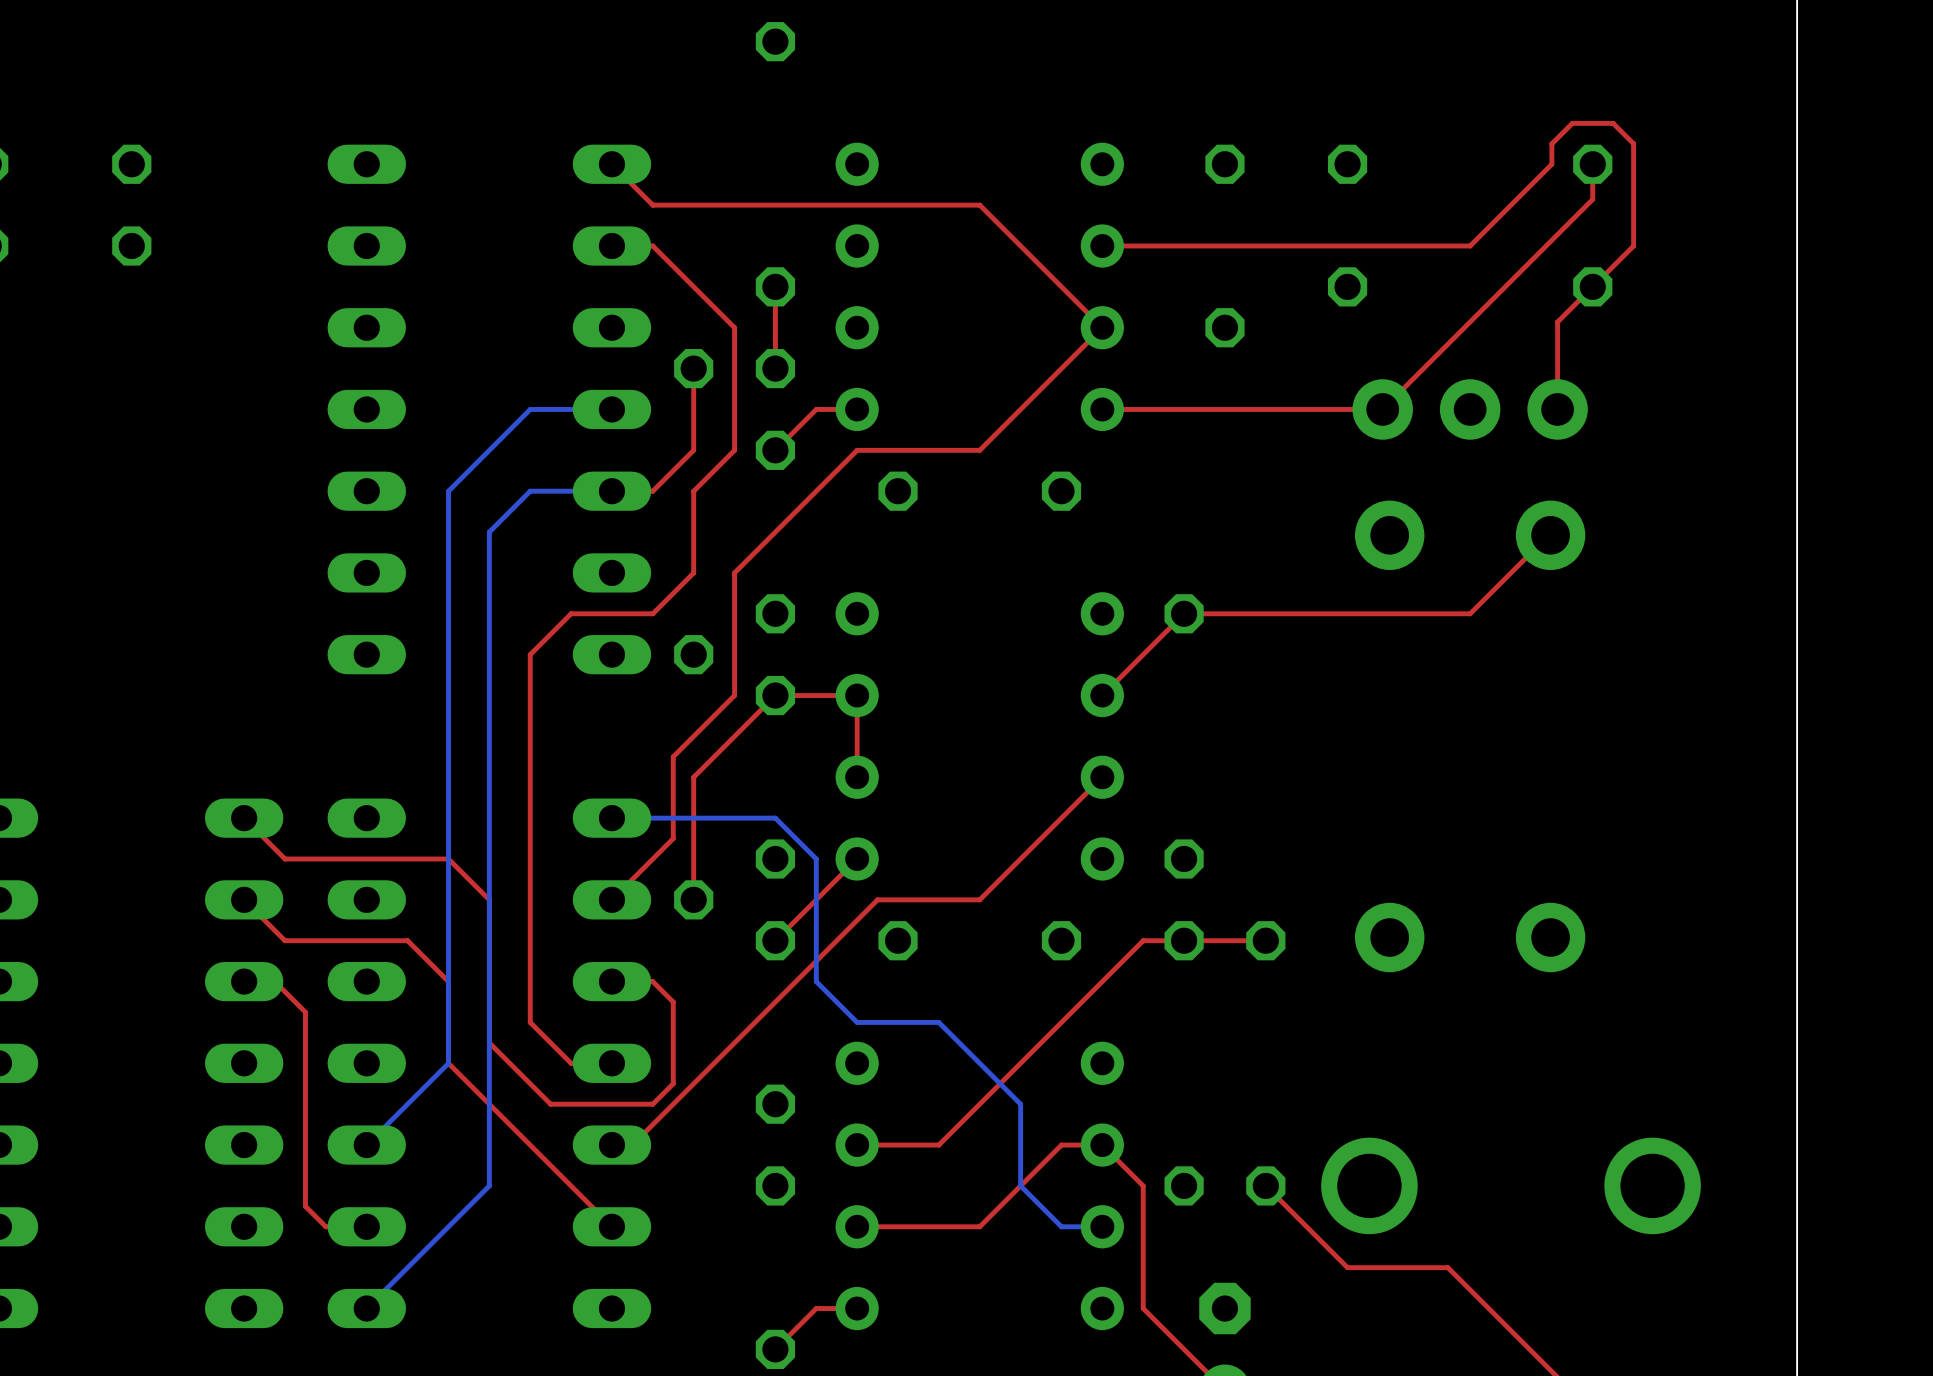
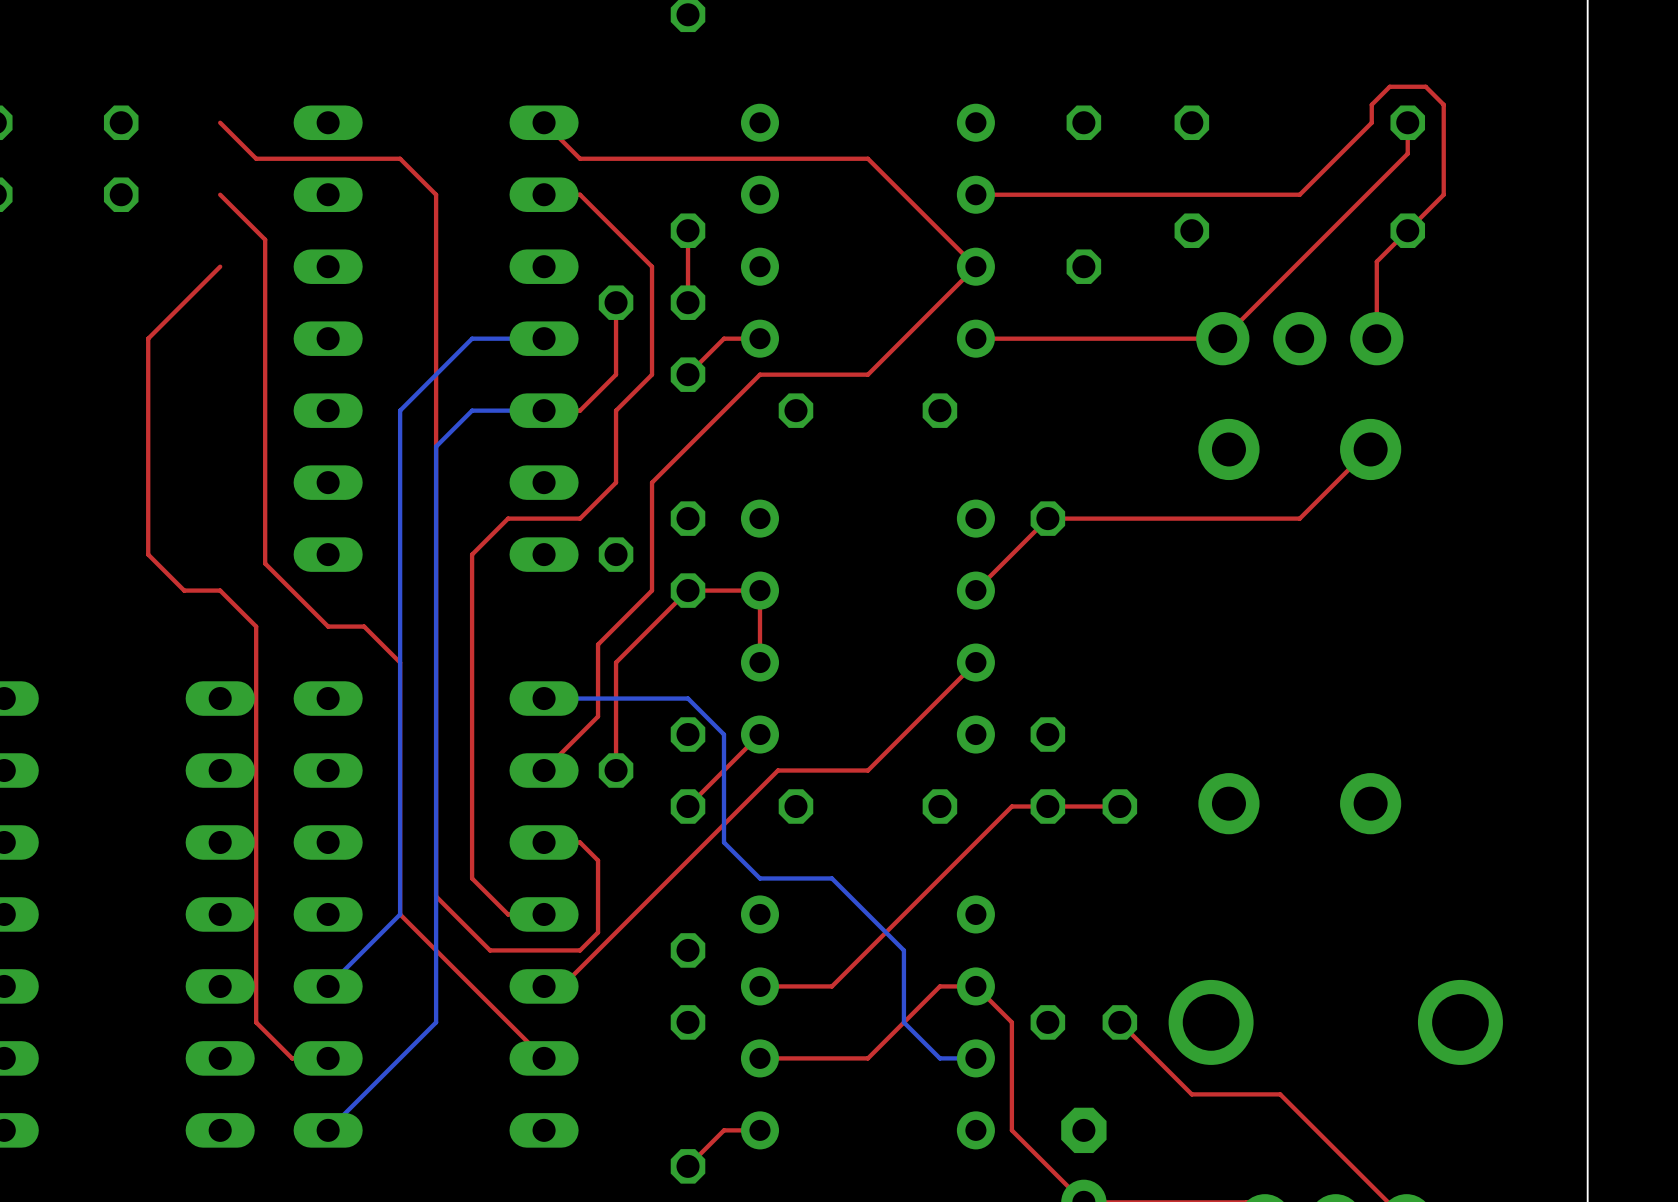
top track: (244, 818) (285, 858) (448, 858) (489, 899) -> (220, 122) (256, 158) (400, 158) (436, 194) (436, 770)
top track: (244, 899) (285, 940) (407, 940) (448, 981) -> (220, 194) (265, 239) (265, 563) (328, 626) (364, 626) (400, 662) (400, 842)
top track: (244, 981) (274, 981) (305, 1012) (305, 1206) -> (220, 266) (148, 338) (148, 554) (184, 590) (220, 590) (256, 626) (256, 1022) (274, 1040)

